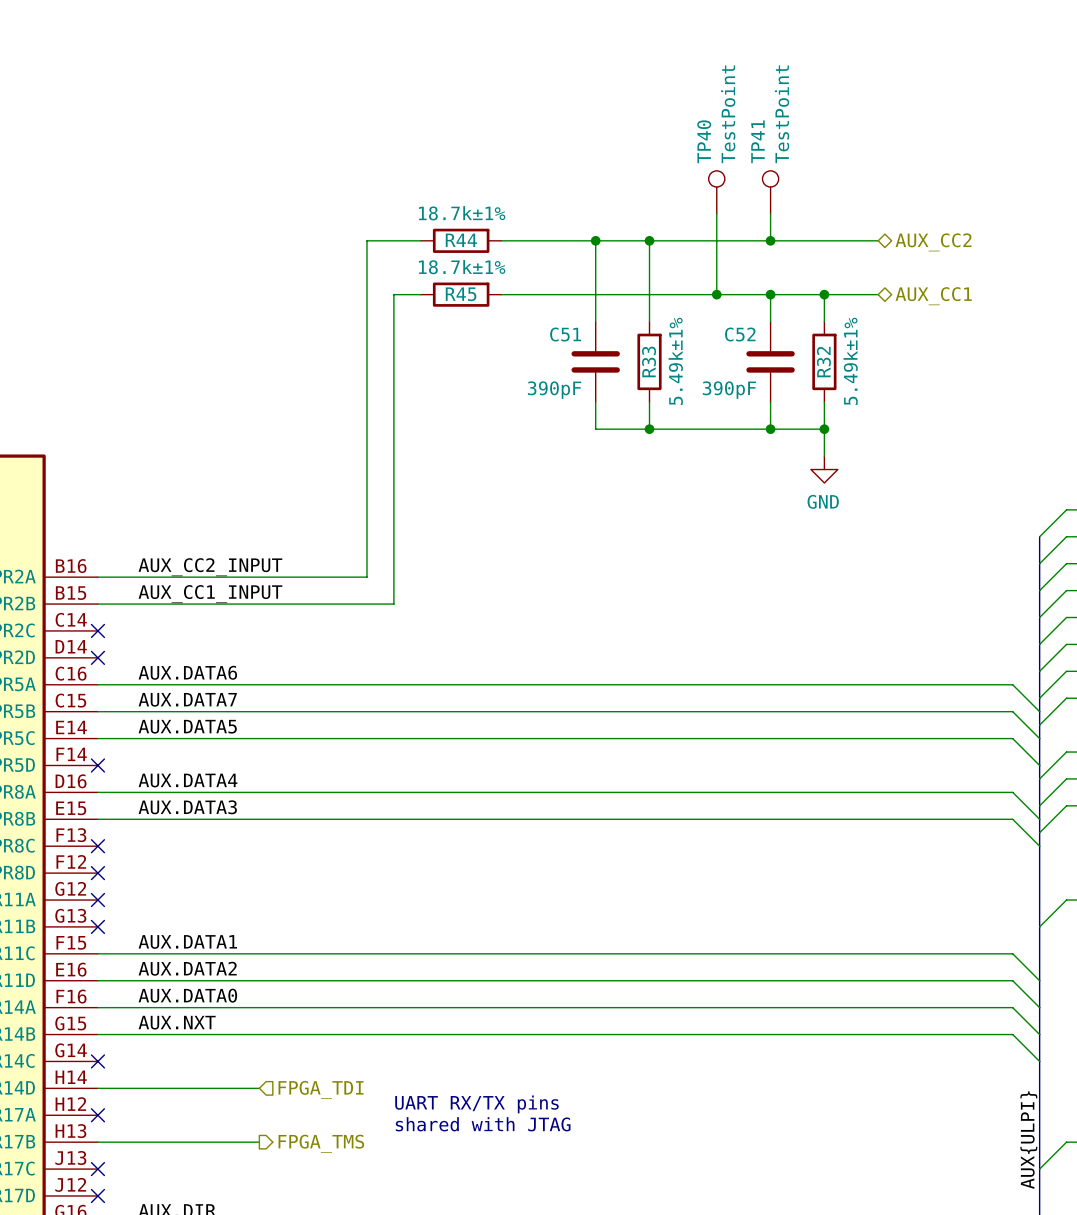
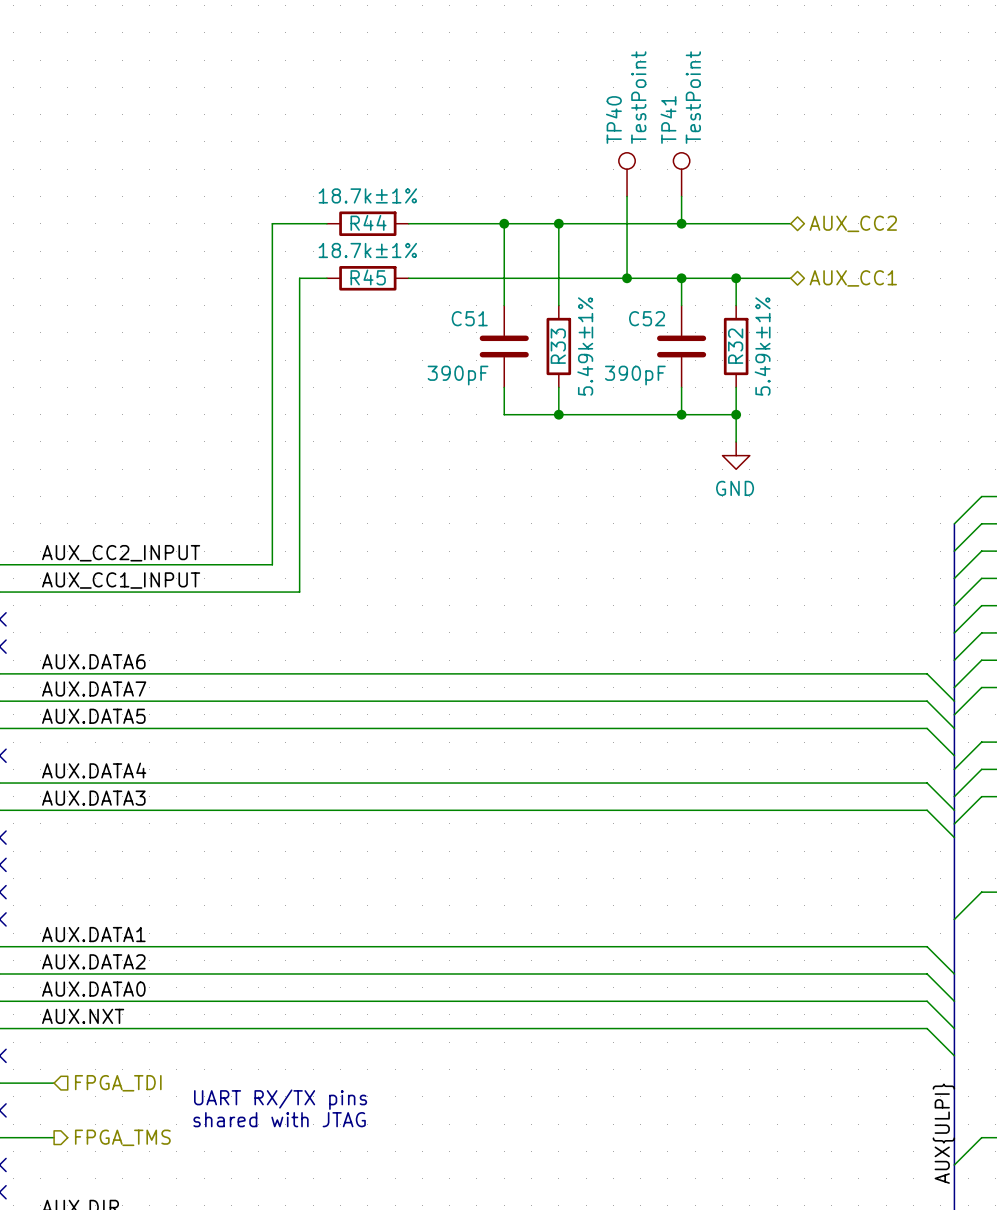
wire: (151, 1088) (259, 1088) -> none
hierarchical label position: FPGA_TDI (321, 1089) -> FPGA_TDI (118, 1083)
text position: UART RX/TX pins (476, 1104) -> UART RX/TX pins (280, 1099)
text position: shared with JTAG (483, 1124) -> shared with JTAG (279, 1119)
wire: (151, 1142) (259, 1142) -> none
hierarchical label position: FPGA_TMS (321, 1143) -> FPGA_TMS (122, 1137)

